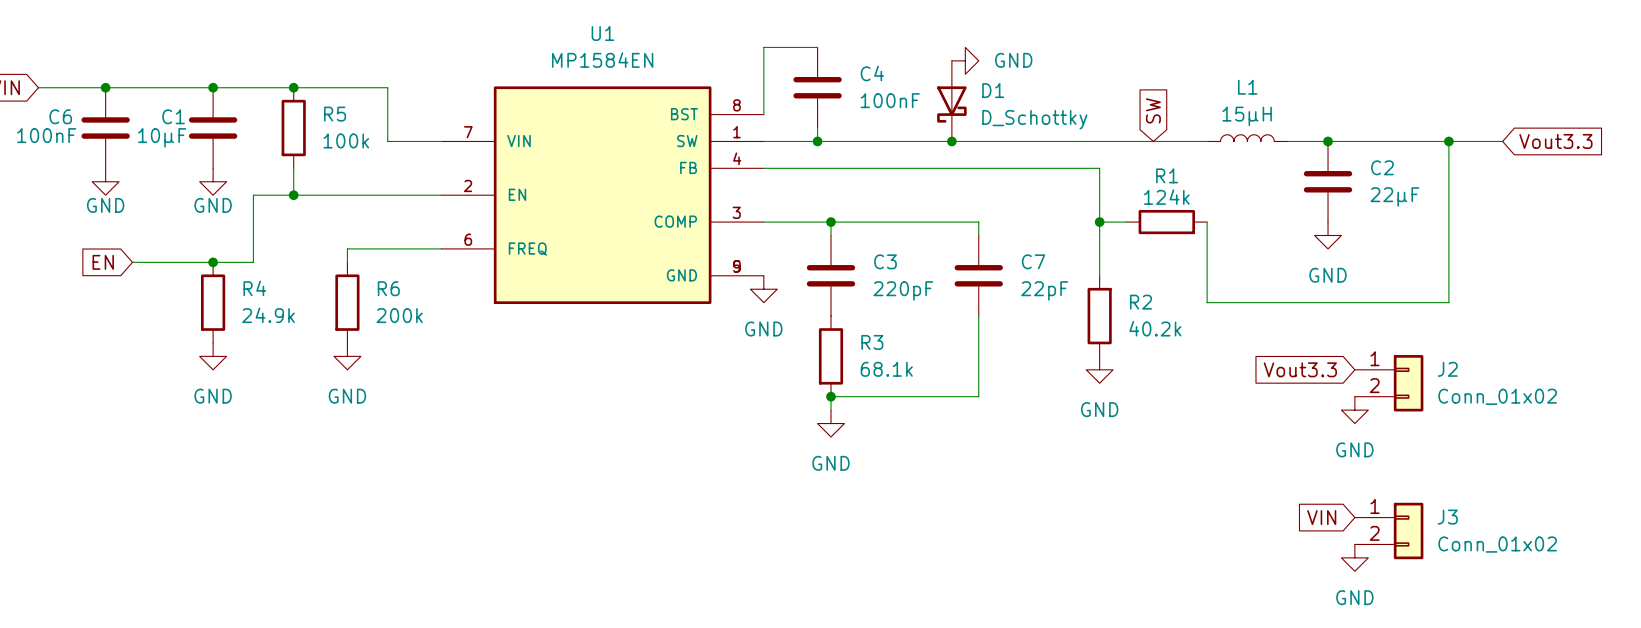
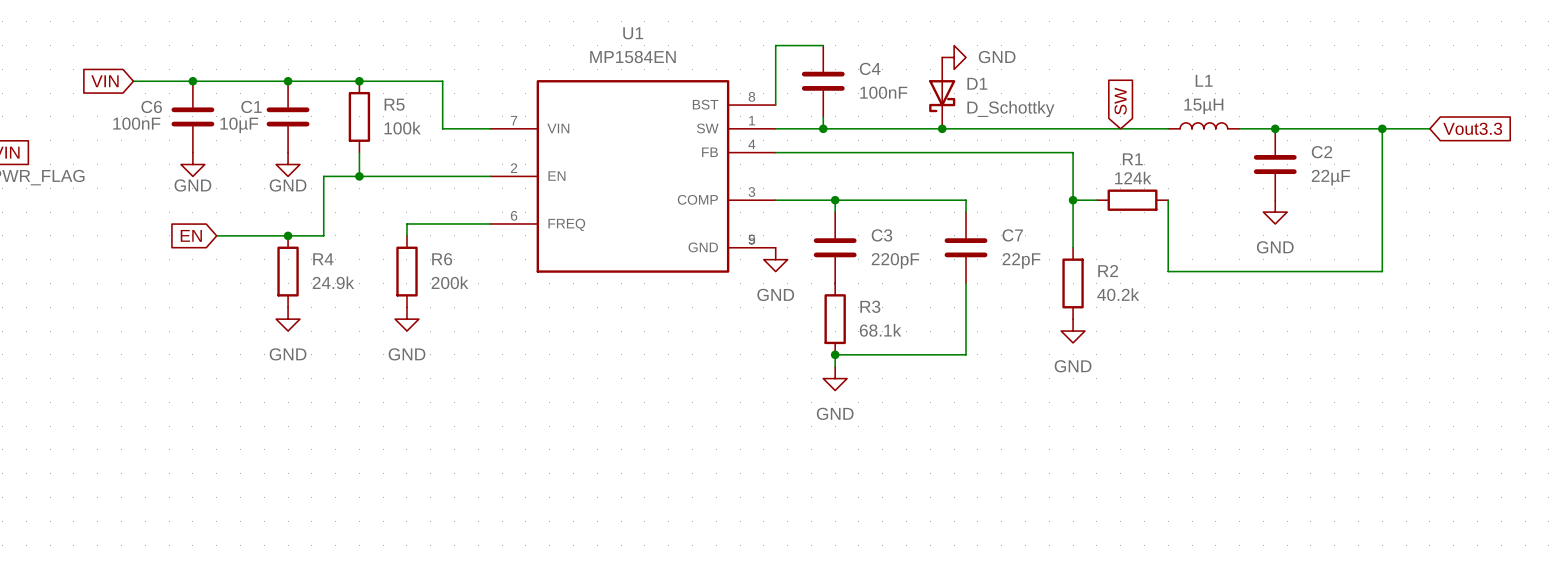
global label: Vout3.3 (1300, 369) -> none
J2: Conn_01x02 (1389, 383) -> none
power symbol: GND (1354, 410) -> none
global label: VIN (1321, 517) -> none
J3: Conn_01x02 (1389, 531) -> none
power symbol: GND (1354, 557) -> none

